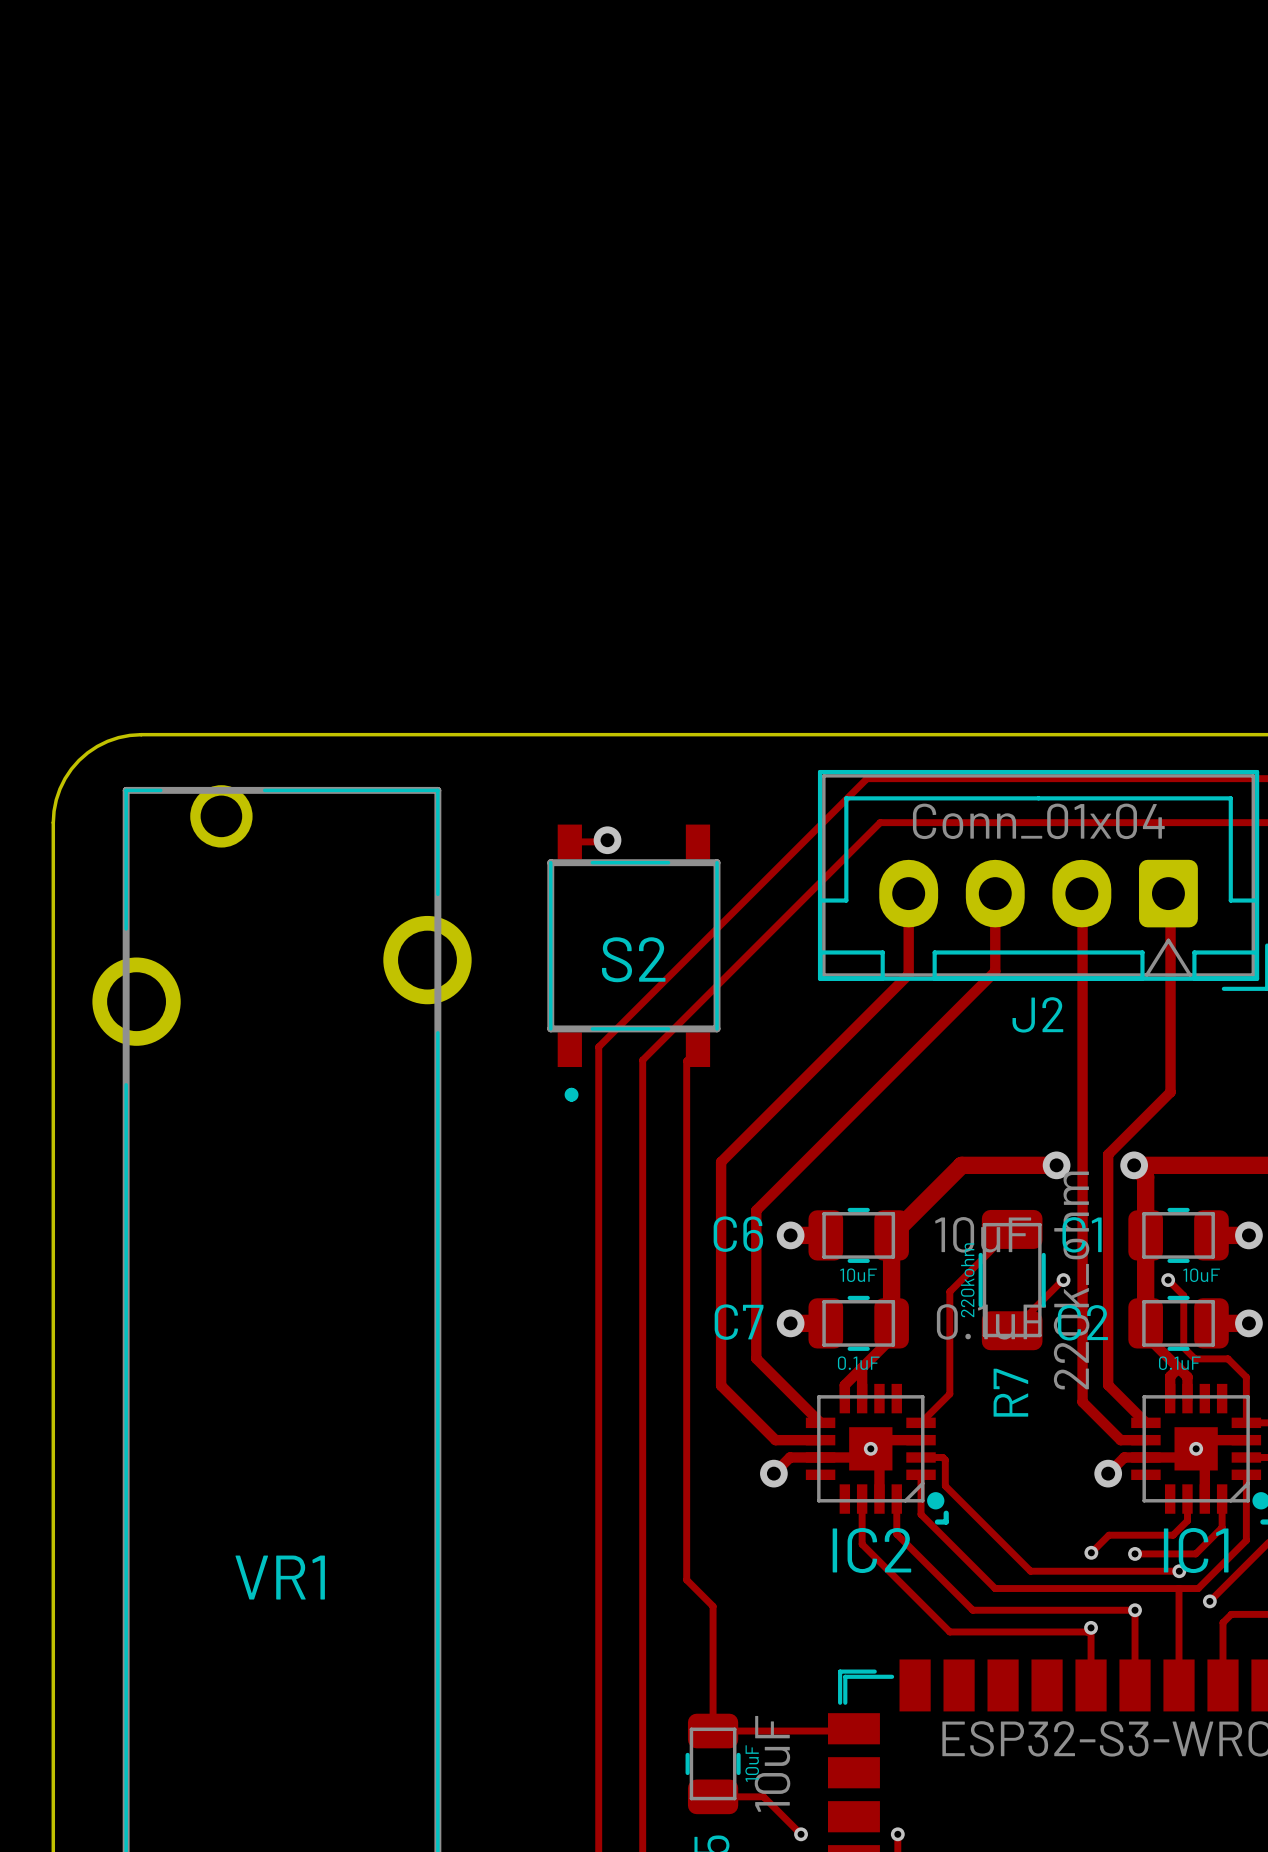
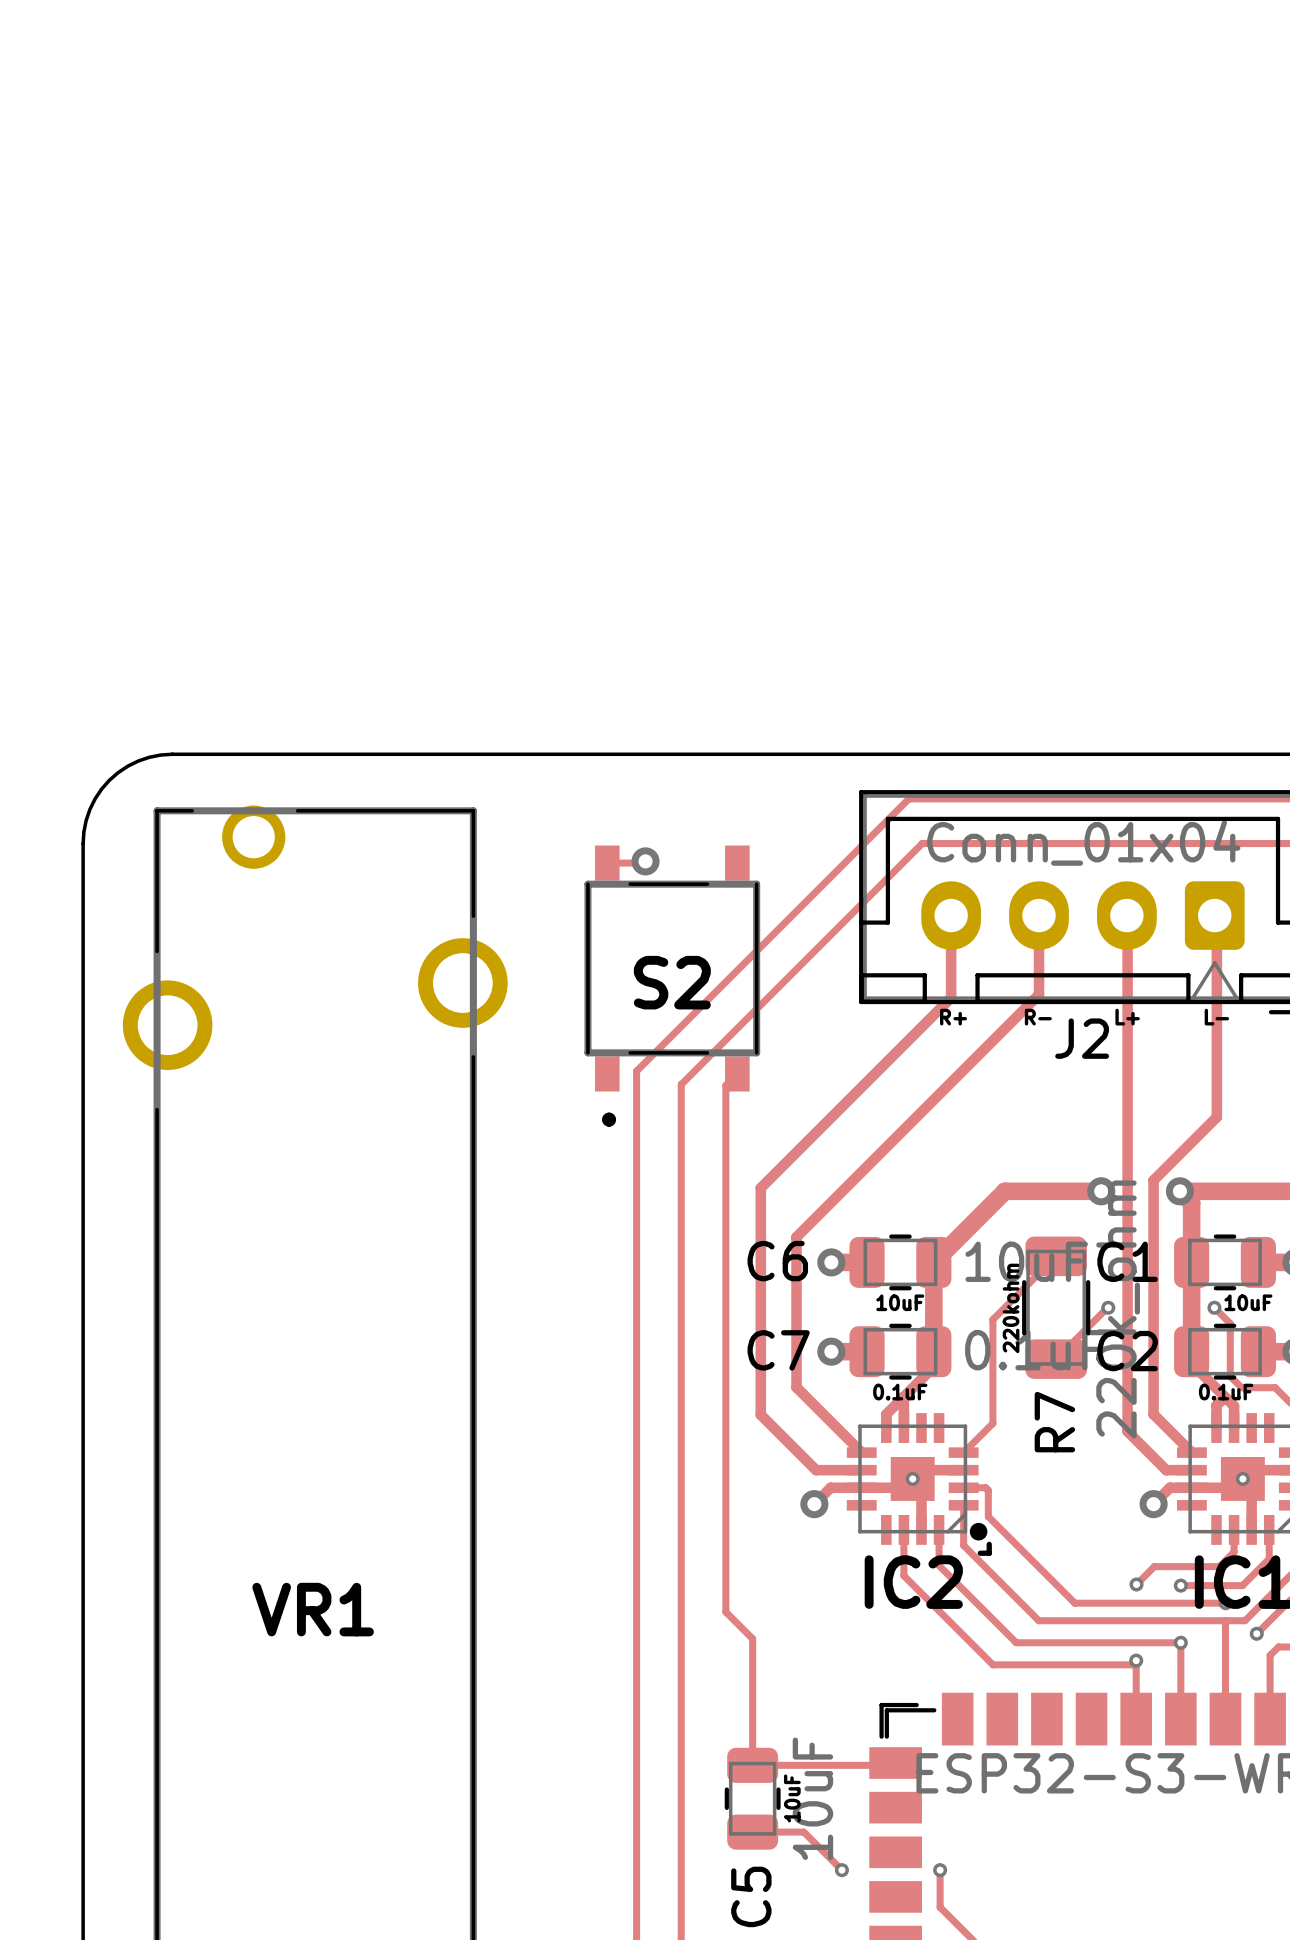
text: none -> R+ (953, 1017)
text: none -> R- (1038, 1017)
text: none -> L+ (1127, 1017)
text: none -> L- (1216, 1017)

